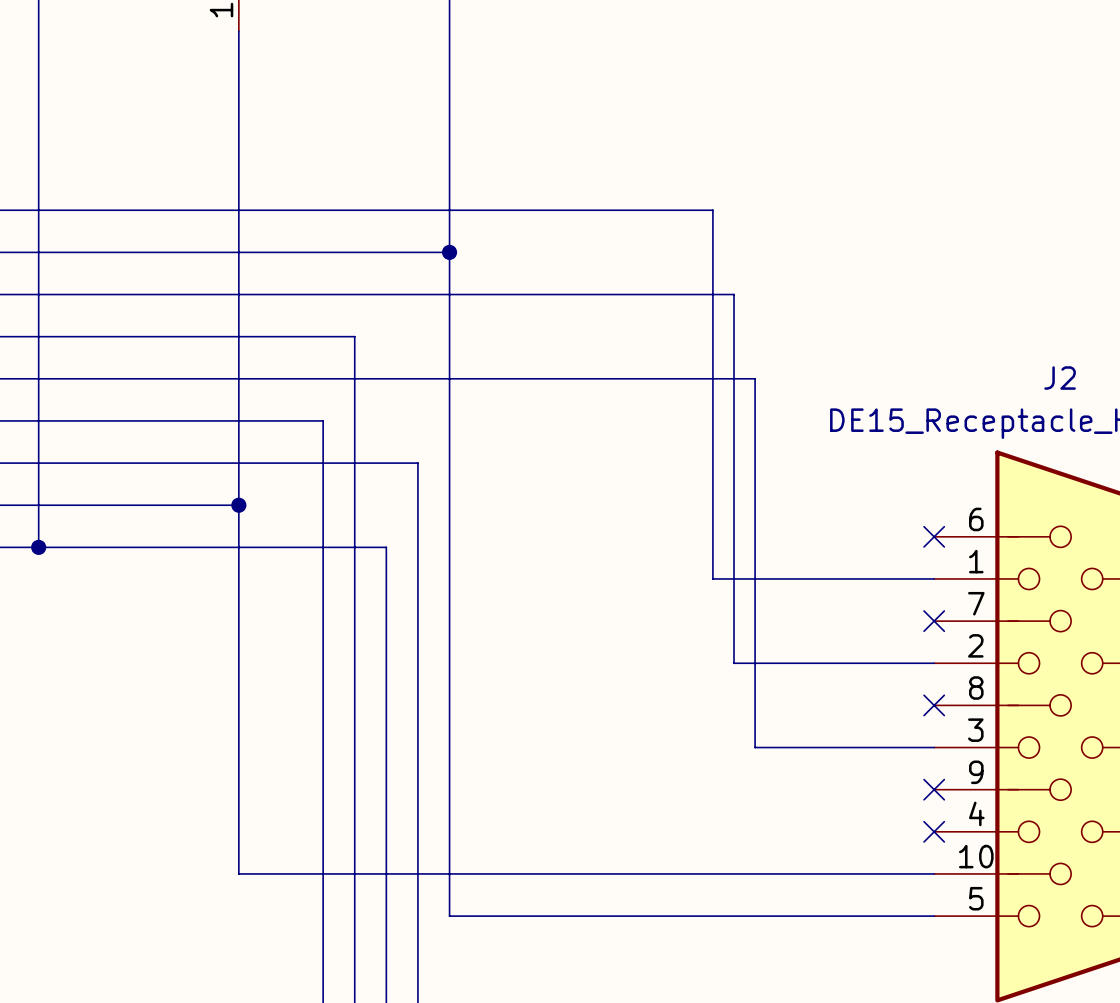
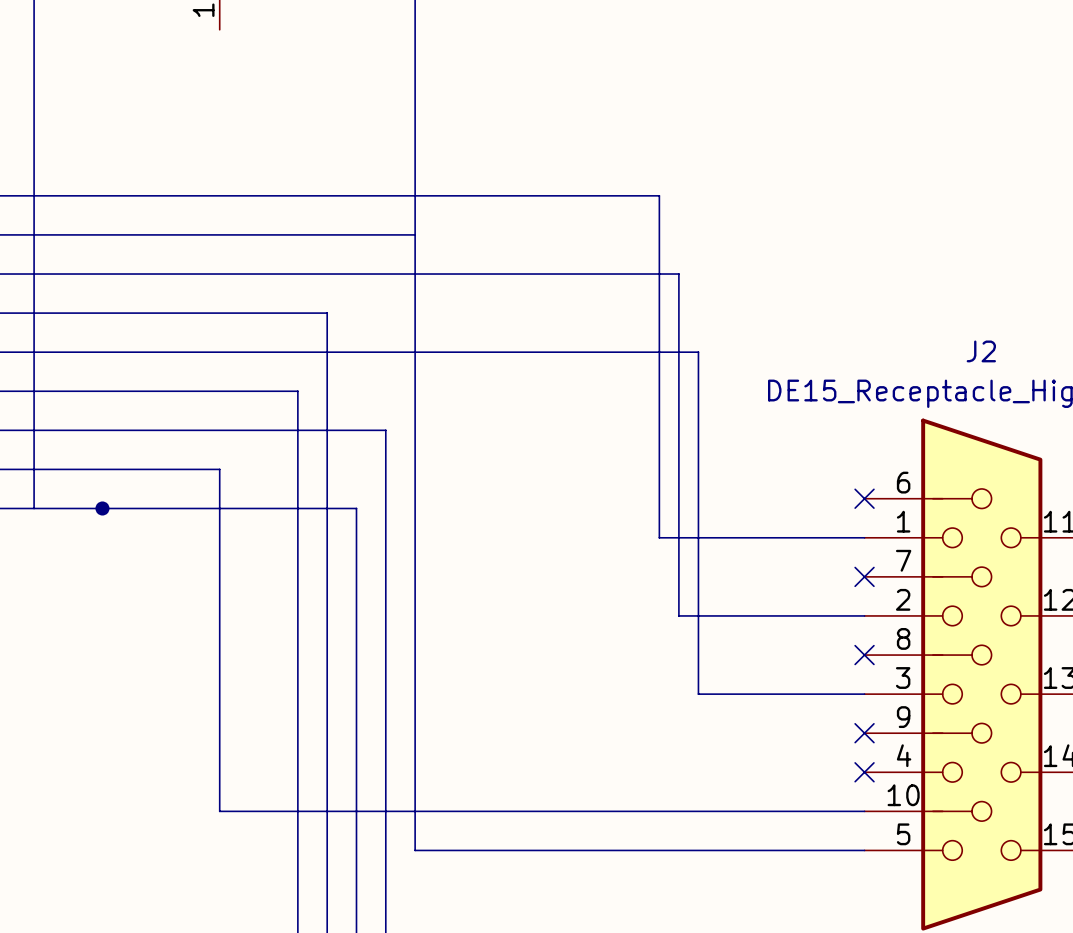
wire: (238, 31) (238, 505) -> none
junction: (449, 252) -> none
junction: (238, 505) -> none
junction: (38, 547) -> none
junction: none -> (102, 508)

